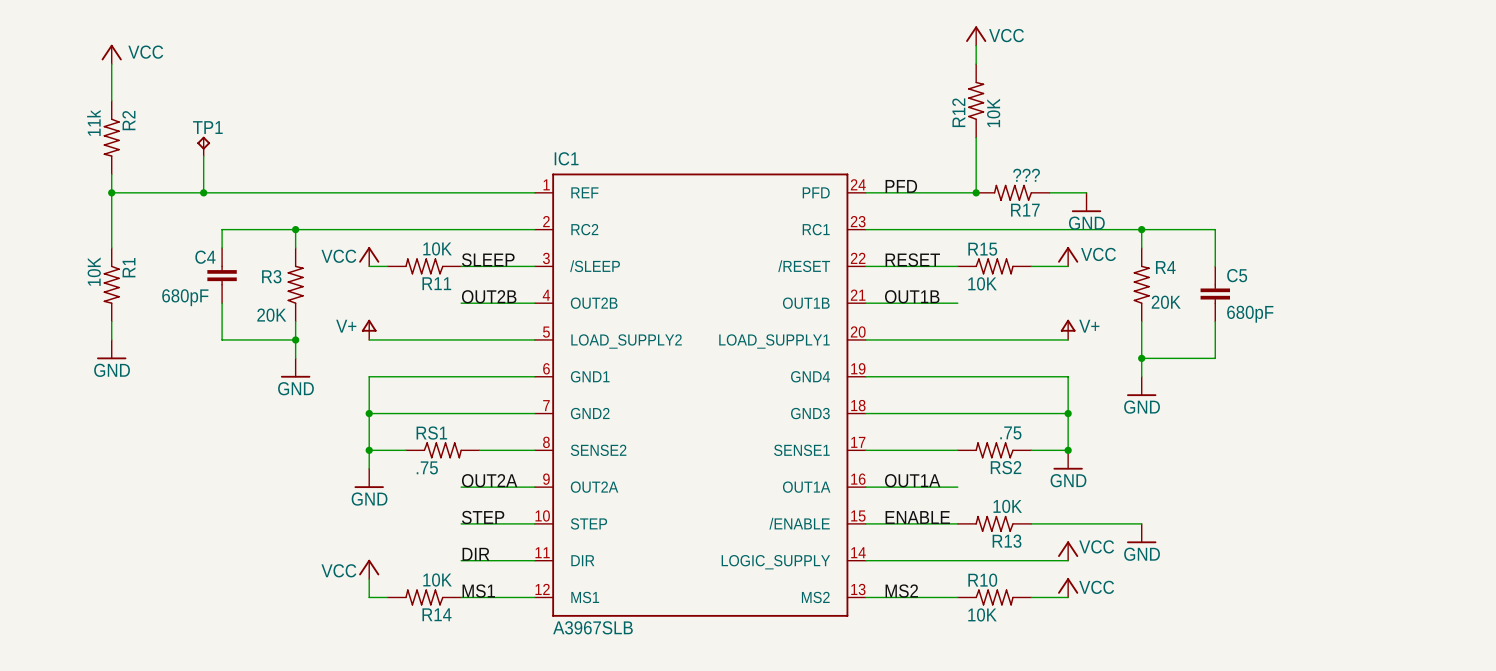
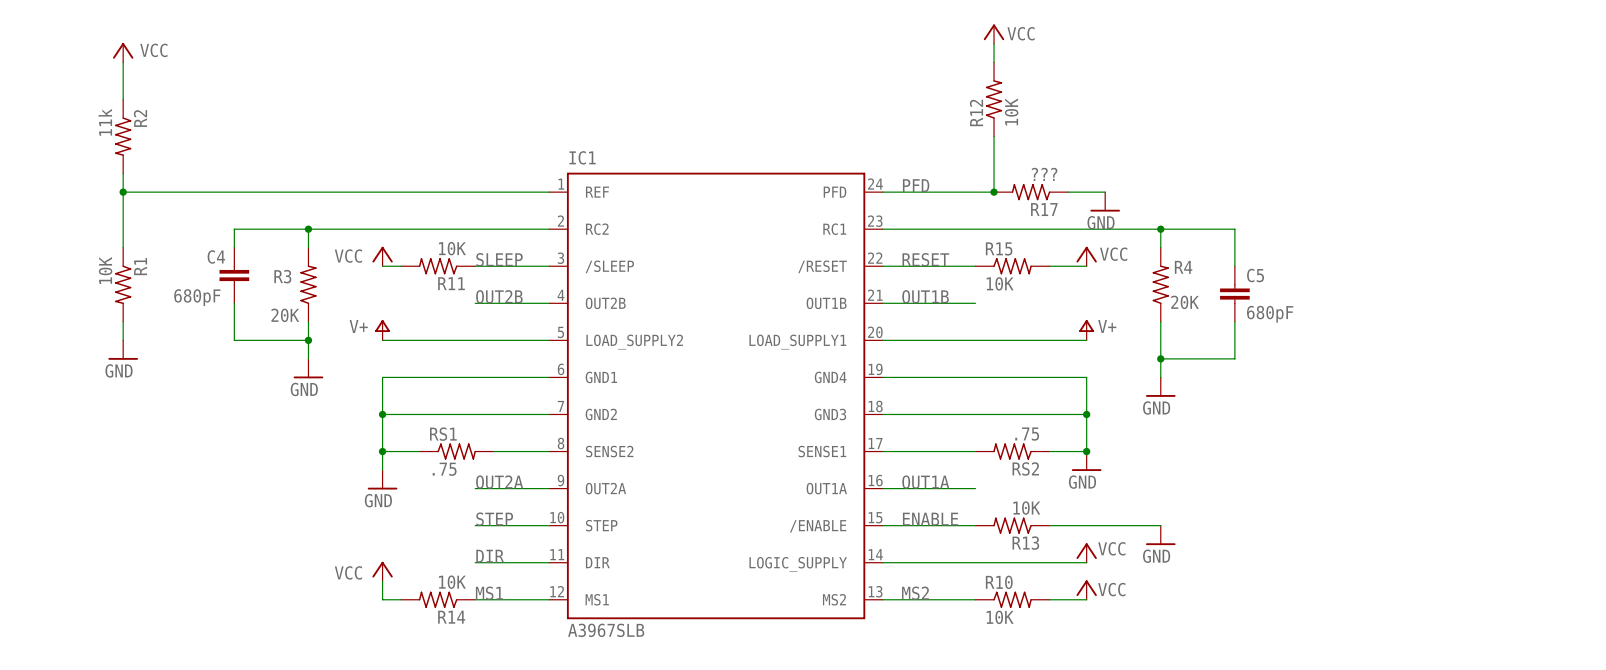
TP1: (203, 146) -> none
wire: (203, 156) (203, 192) -> none
junction: (203, 192) -> none

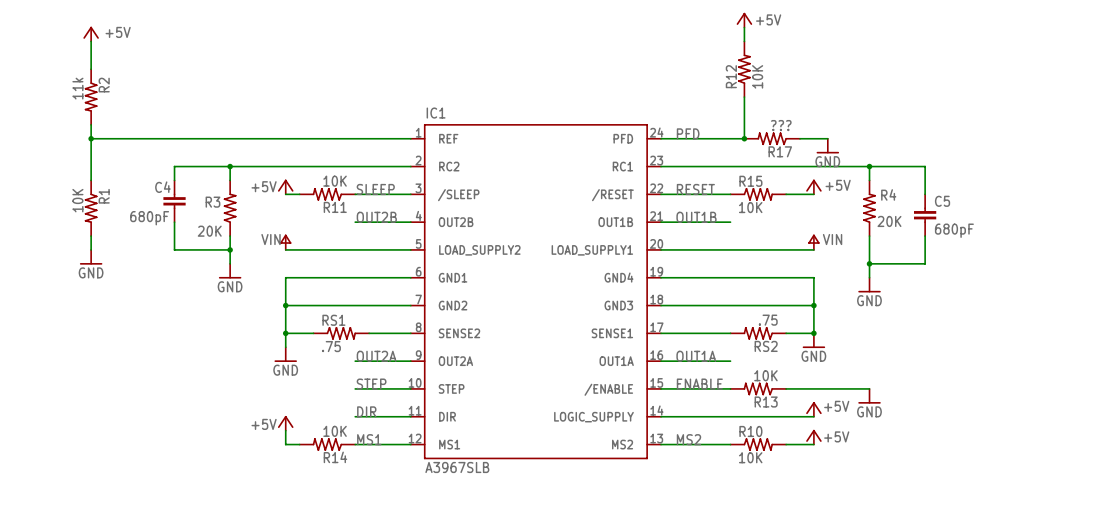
power symbol: VCC (994, 34) -> +5V (744, 20)
power symbol: VCC (123, 52) -> +5V (91, 34)
power symbol: VCC (382, 256) -> +5V (285, 187)
power symbol: VCC (1086, 256) -> +5V (813, 187)
power symbol: V+ (382, 330) -> VIN (285, 242)
power symbol: V+ (1086, 330) -> VIN (813, 242)
power symbol: VCC (1086, 552) -> +5V (813, 409)
power symbol: VCC (382, 571) -> +5V (285, 423)
power symbol: VCC (1086, 590) -> +5V (813, 437)

